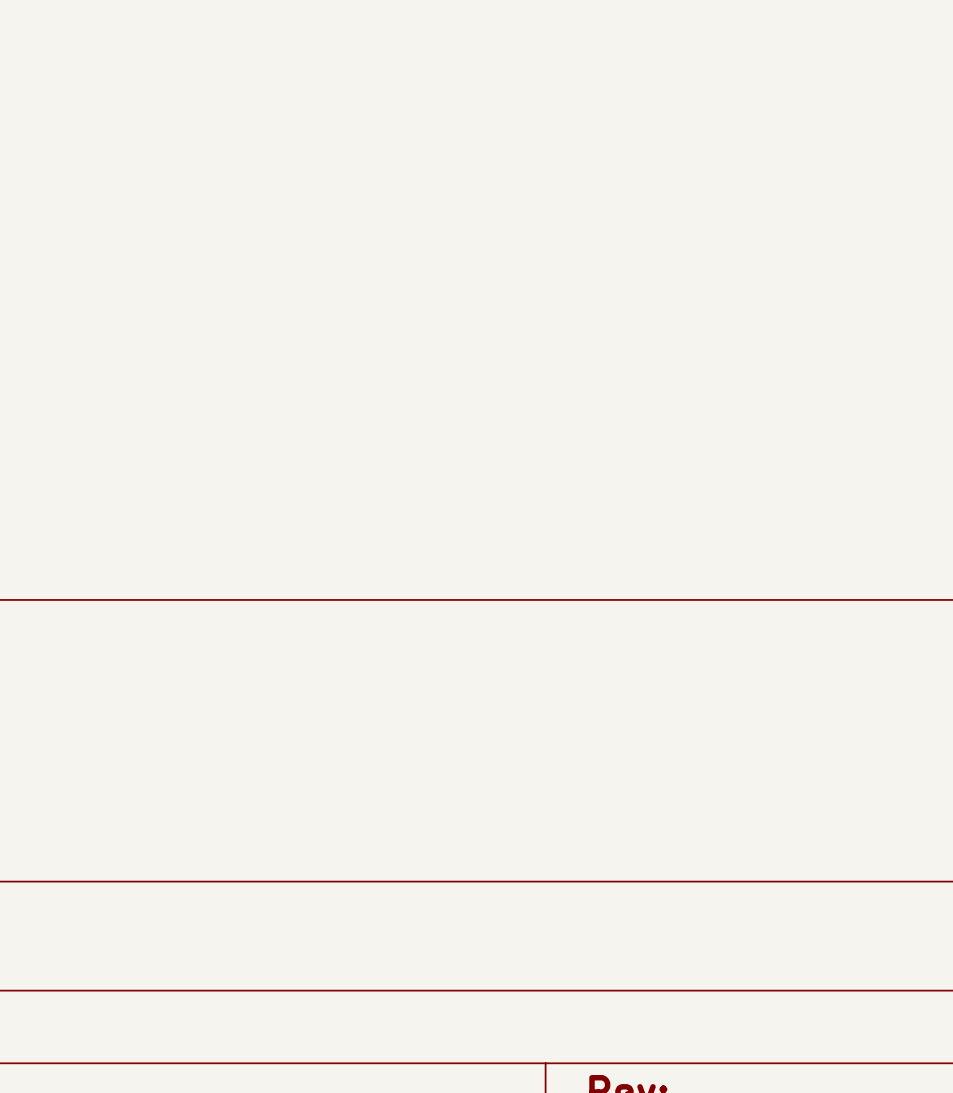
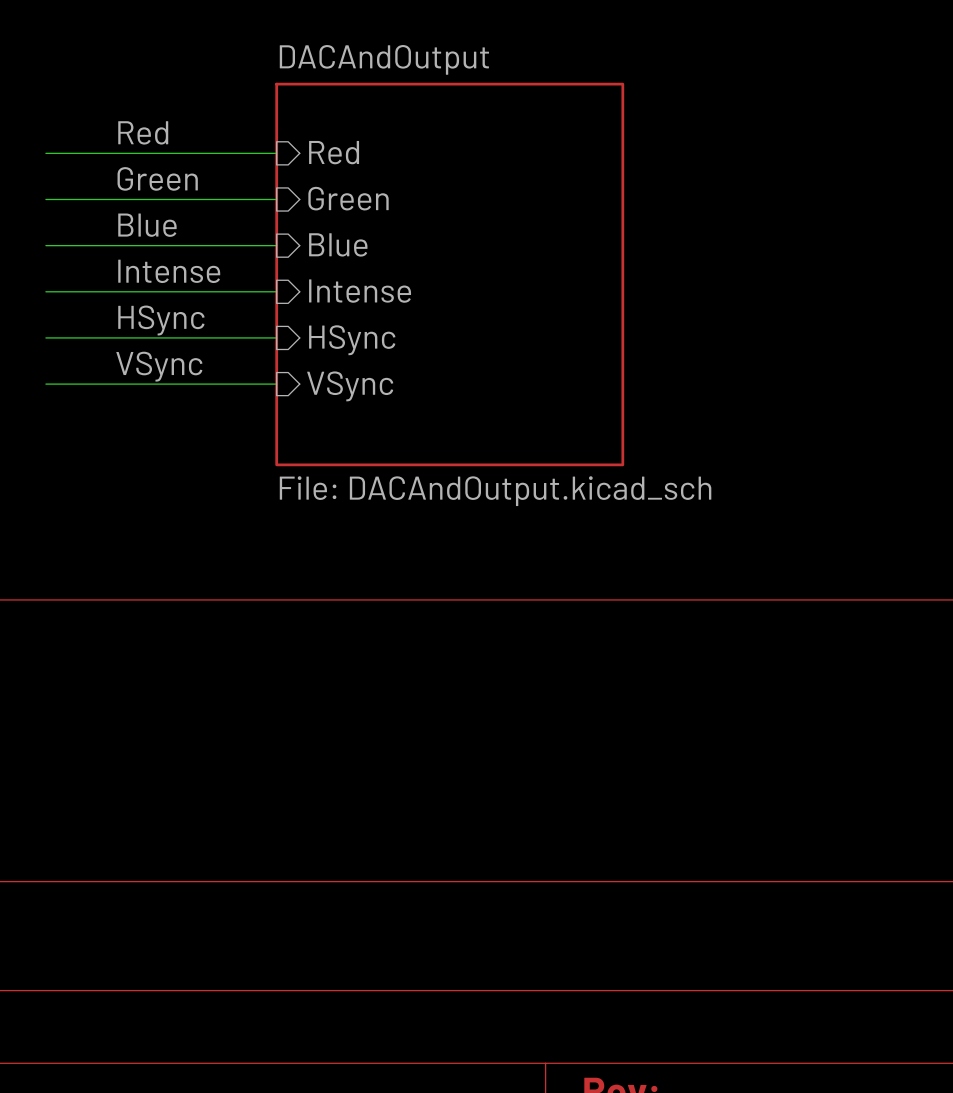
label: none -> Red (143, 132)
sheet pin: none -> Red (334, 152)
wire: none -> (45, 153) (276, 153)
label: none -> Green (157, 178)
sheet pin: none -> Green (348, 198)
wire: none -> (45, 199) (276, 199)
label: none -> Blue (147, 225)
sheet pin: none -> Blue (338, 244)
wire: none -> (45, 245) (276, 245)
label: none -> Intense (169, 271)
sheet DACAndOutput: none -> File: DACAndOutput.kicad_sch (449, 274)
sheet pin: none -> Intense (360, 291)
wire: none -> (45, 291) (276, 291)
label: none -> HSync (161, 320)
wire: none -> (45, 337) (276, 337)
sheet pin: none -> HSync (352, 340)
label: none -> VSync (159, 366)
wire: none -> (45, 384) (276, 384)
sheet pin: none -> VSync (350, 386)

